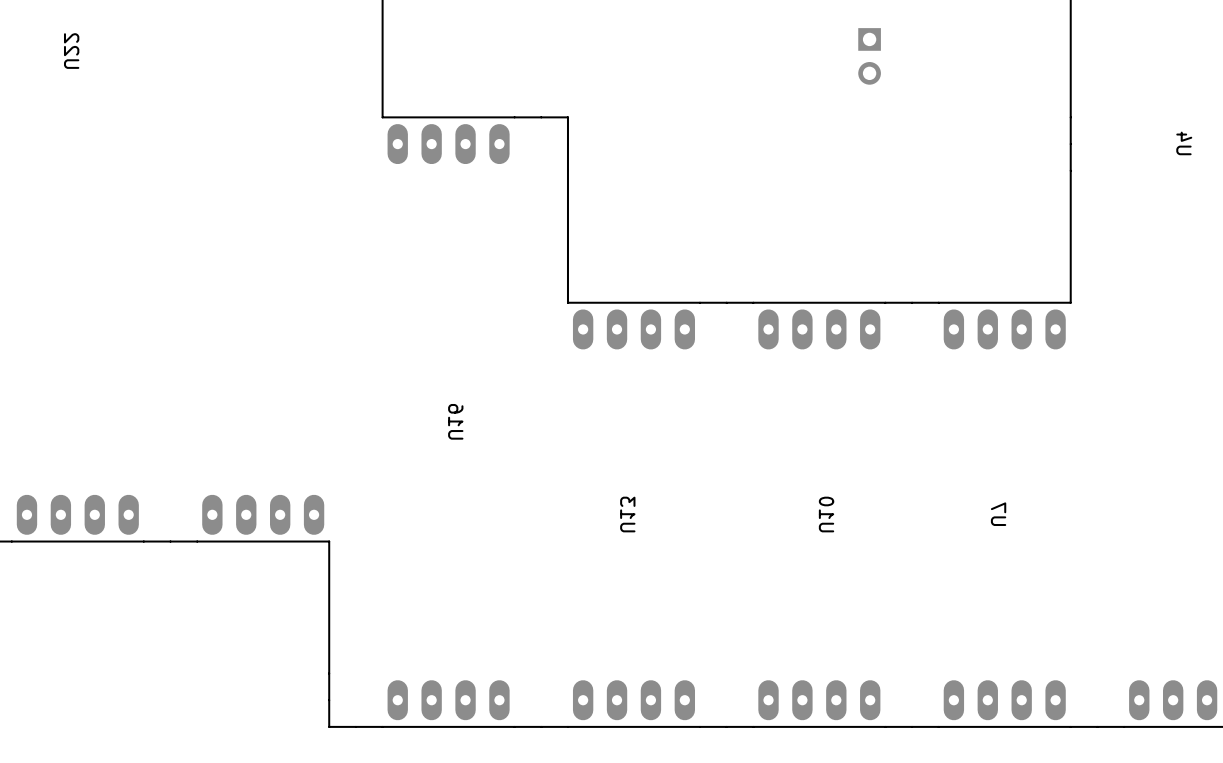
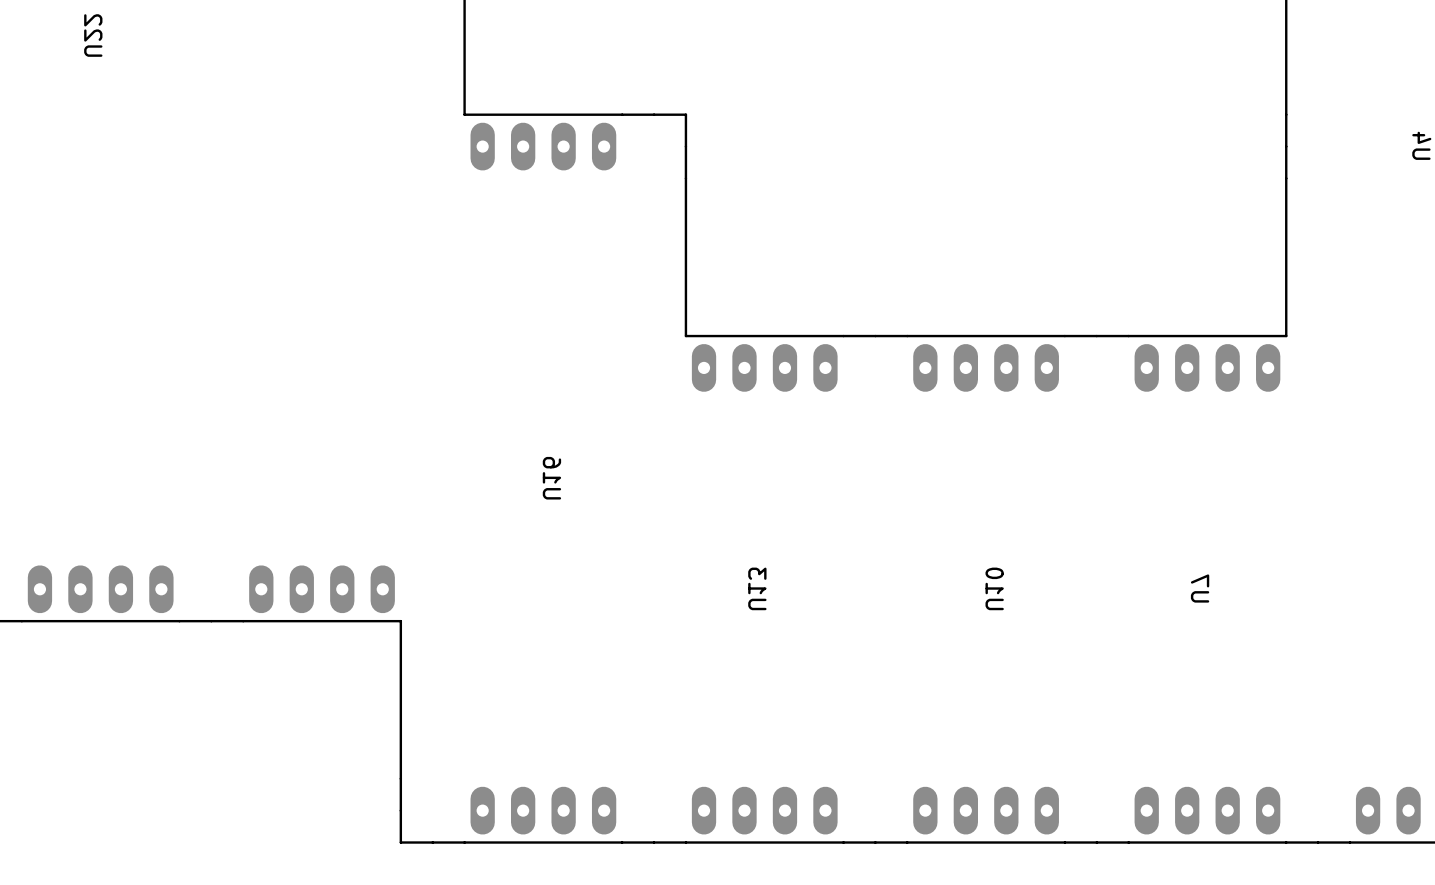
part: (869, 56) -> none

